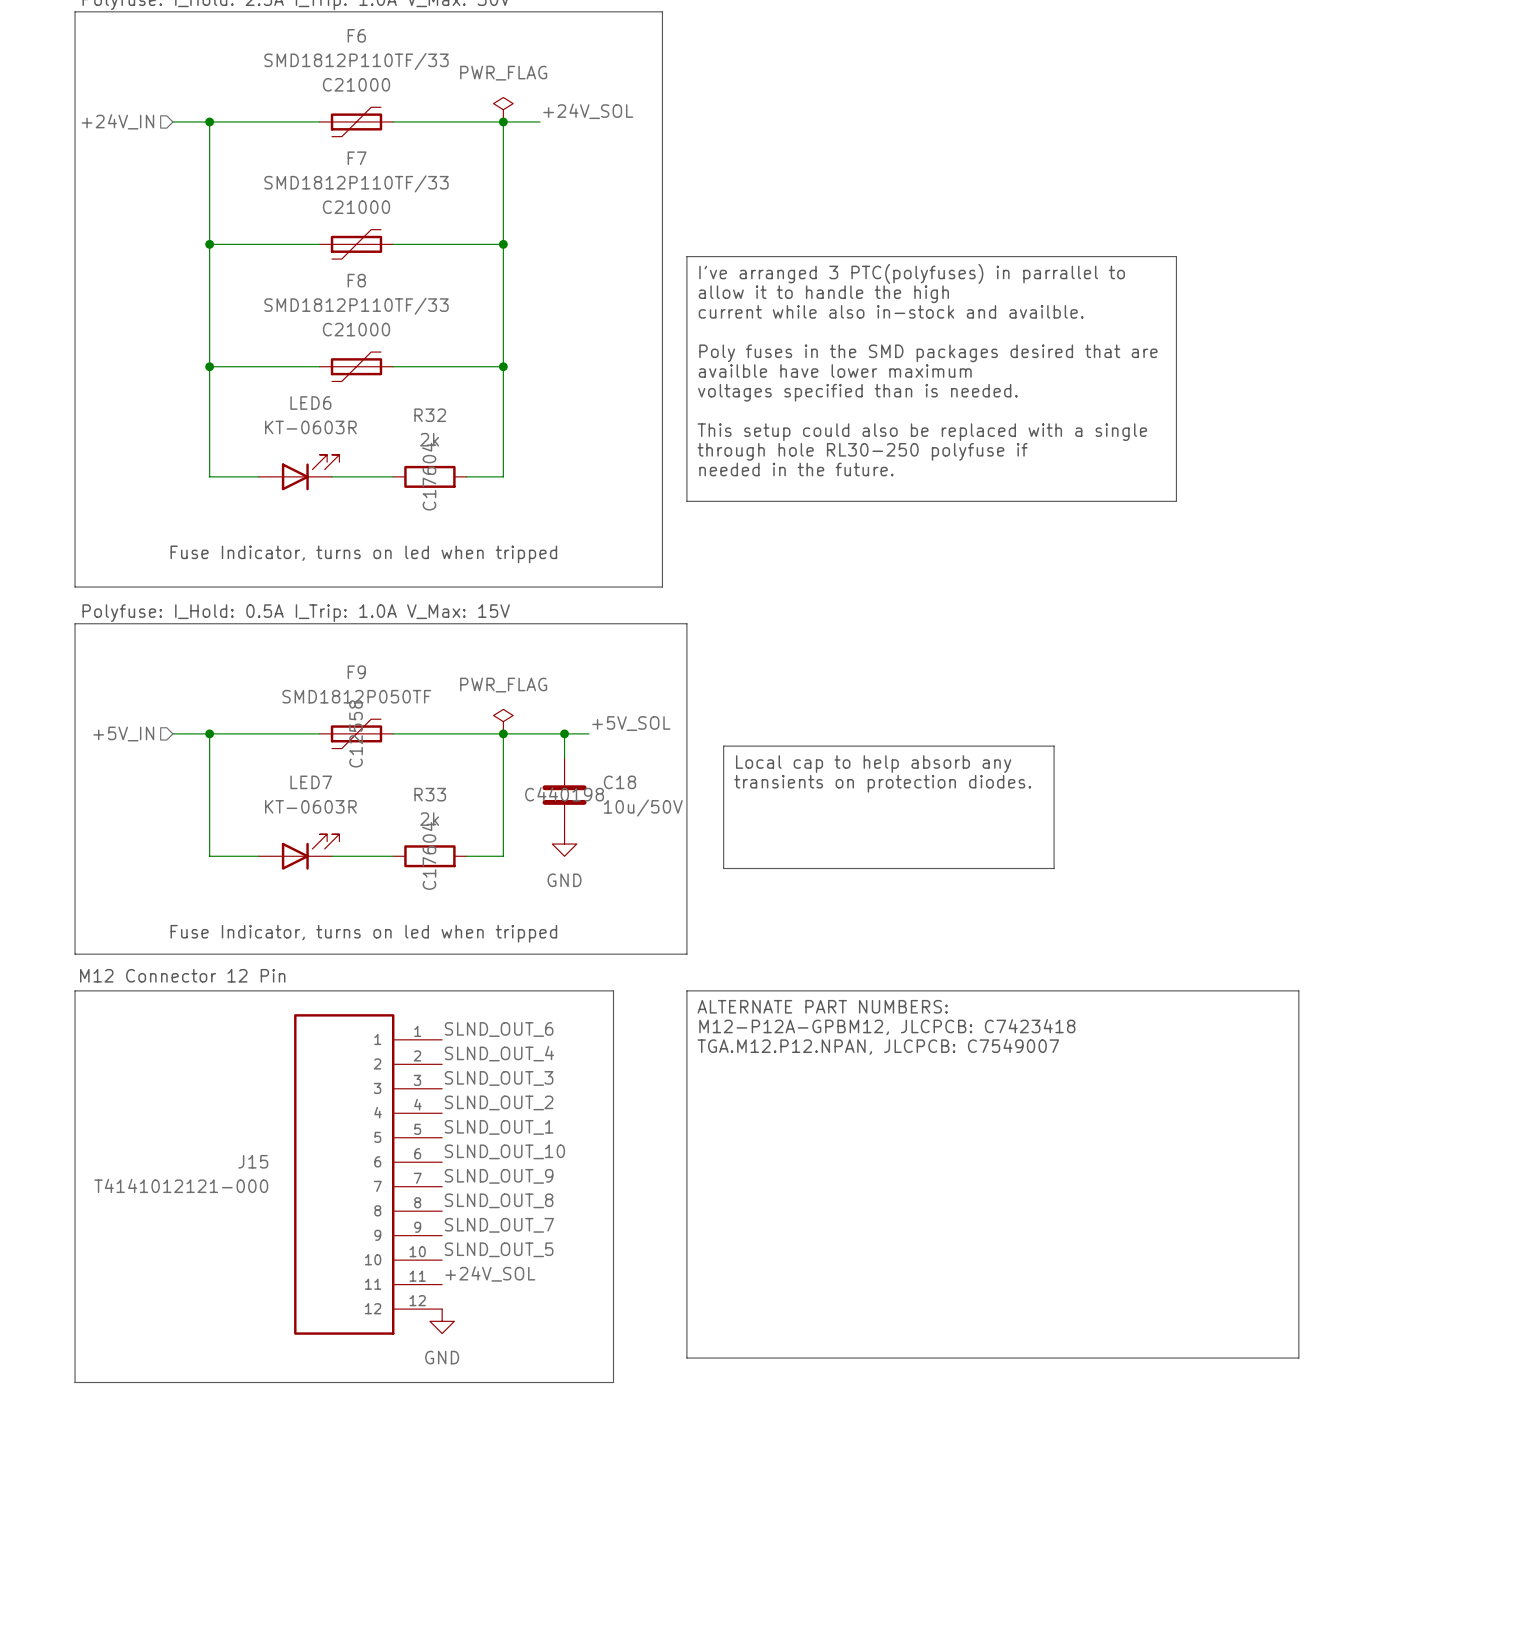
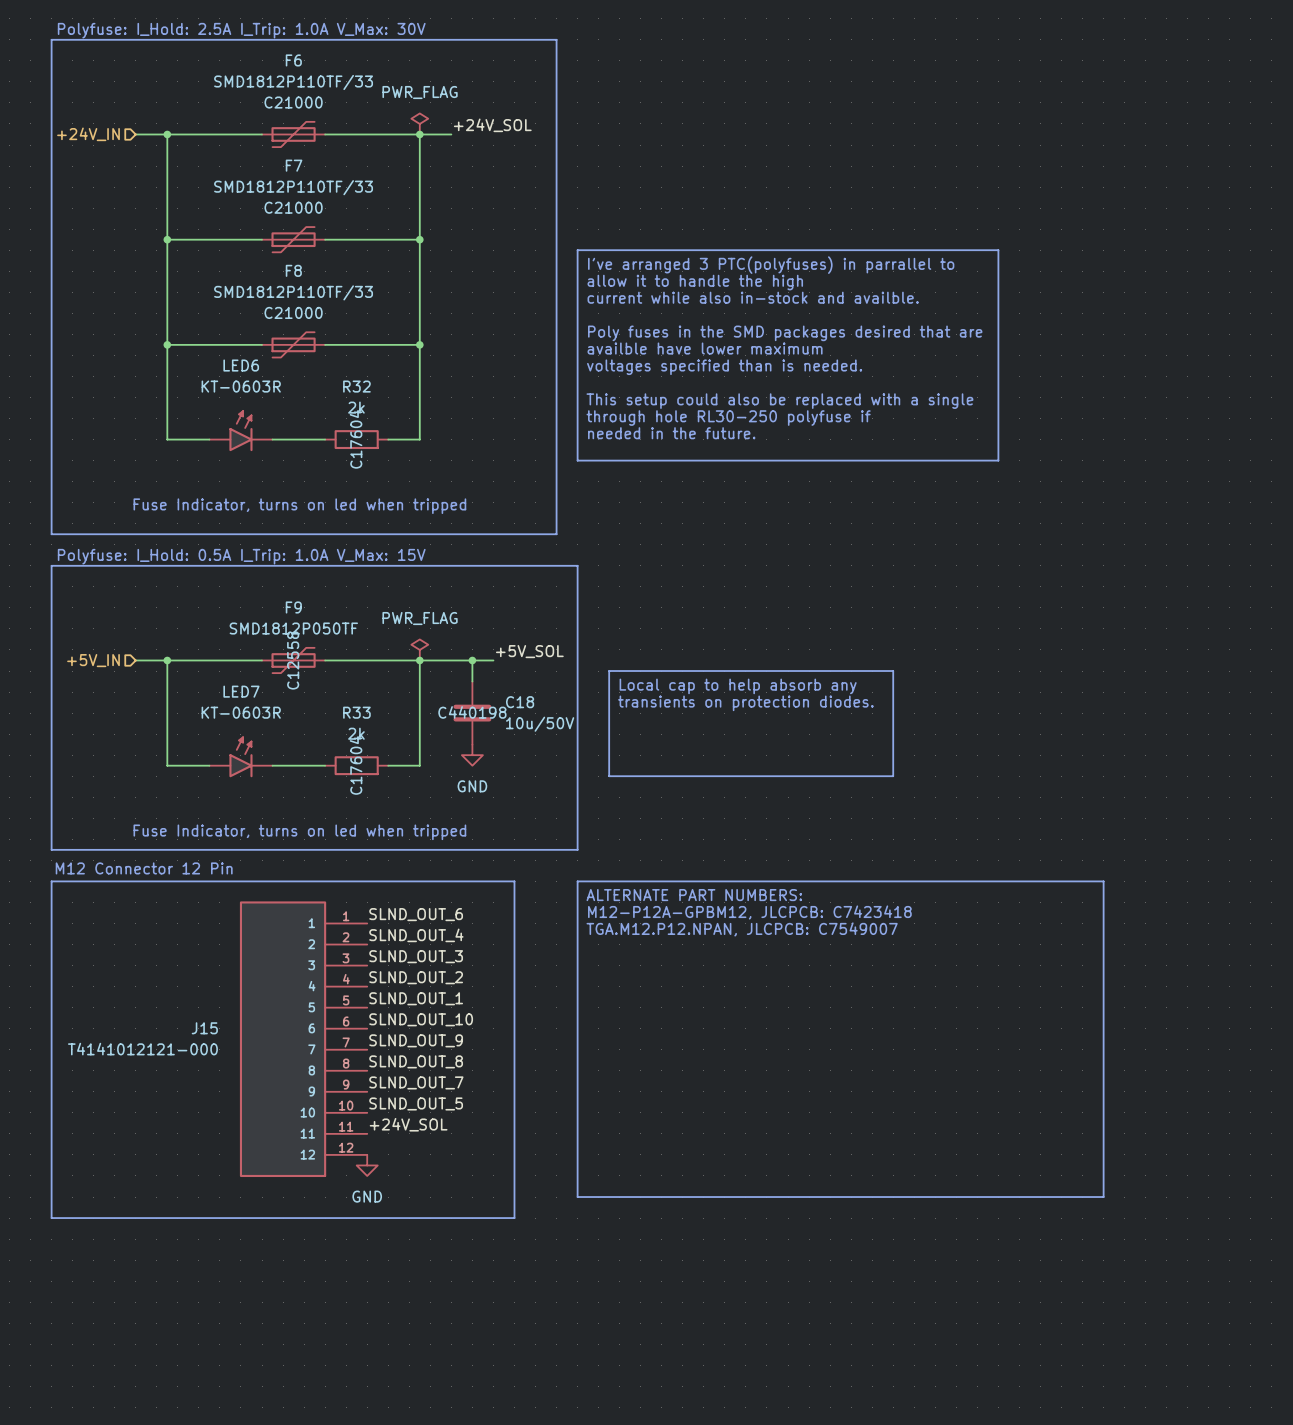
LED6 symbol: [258, 454, 340, 491] -> [209, 410, 273, 452]
LED7 symbol: [258, 834, 340, 870] -> [209, 736, 273, 778]

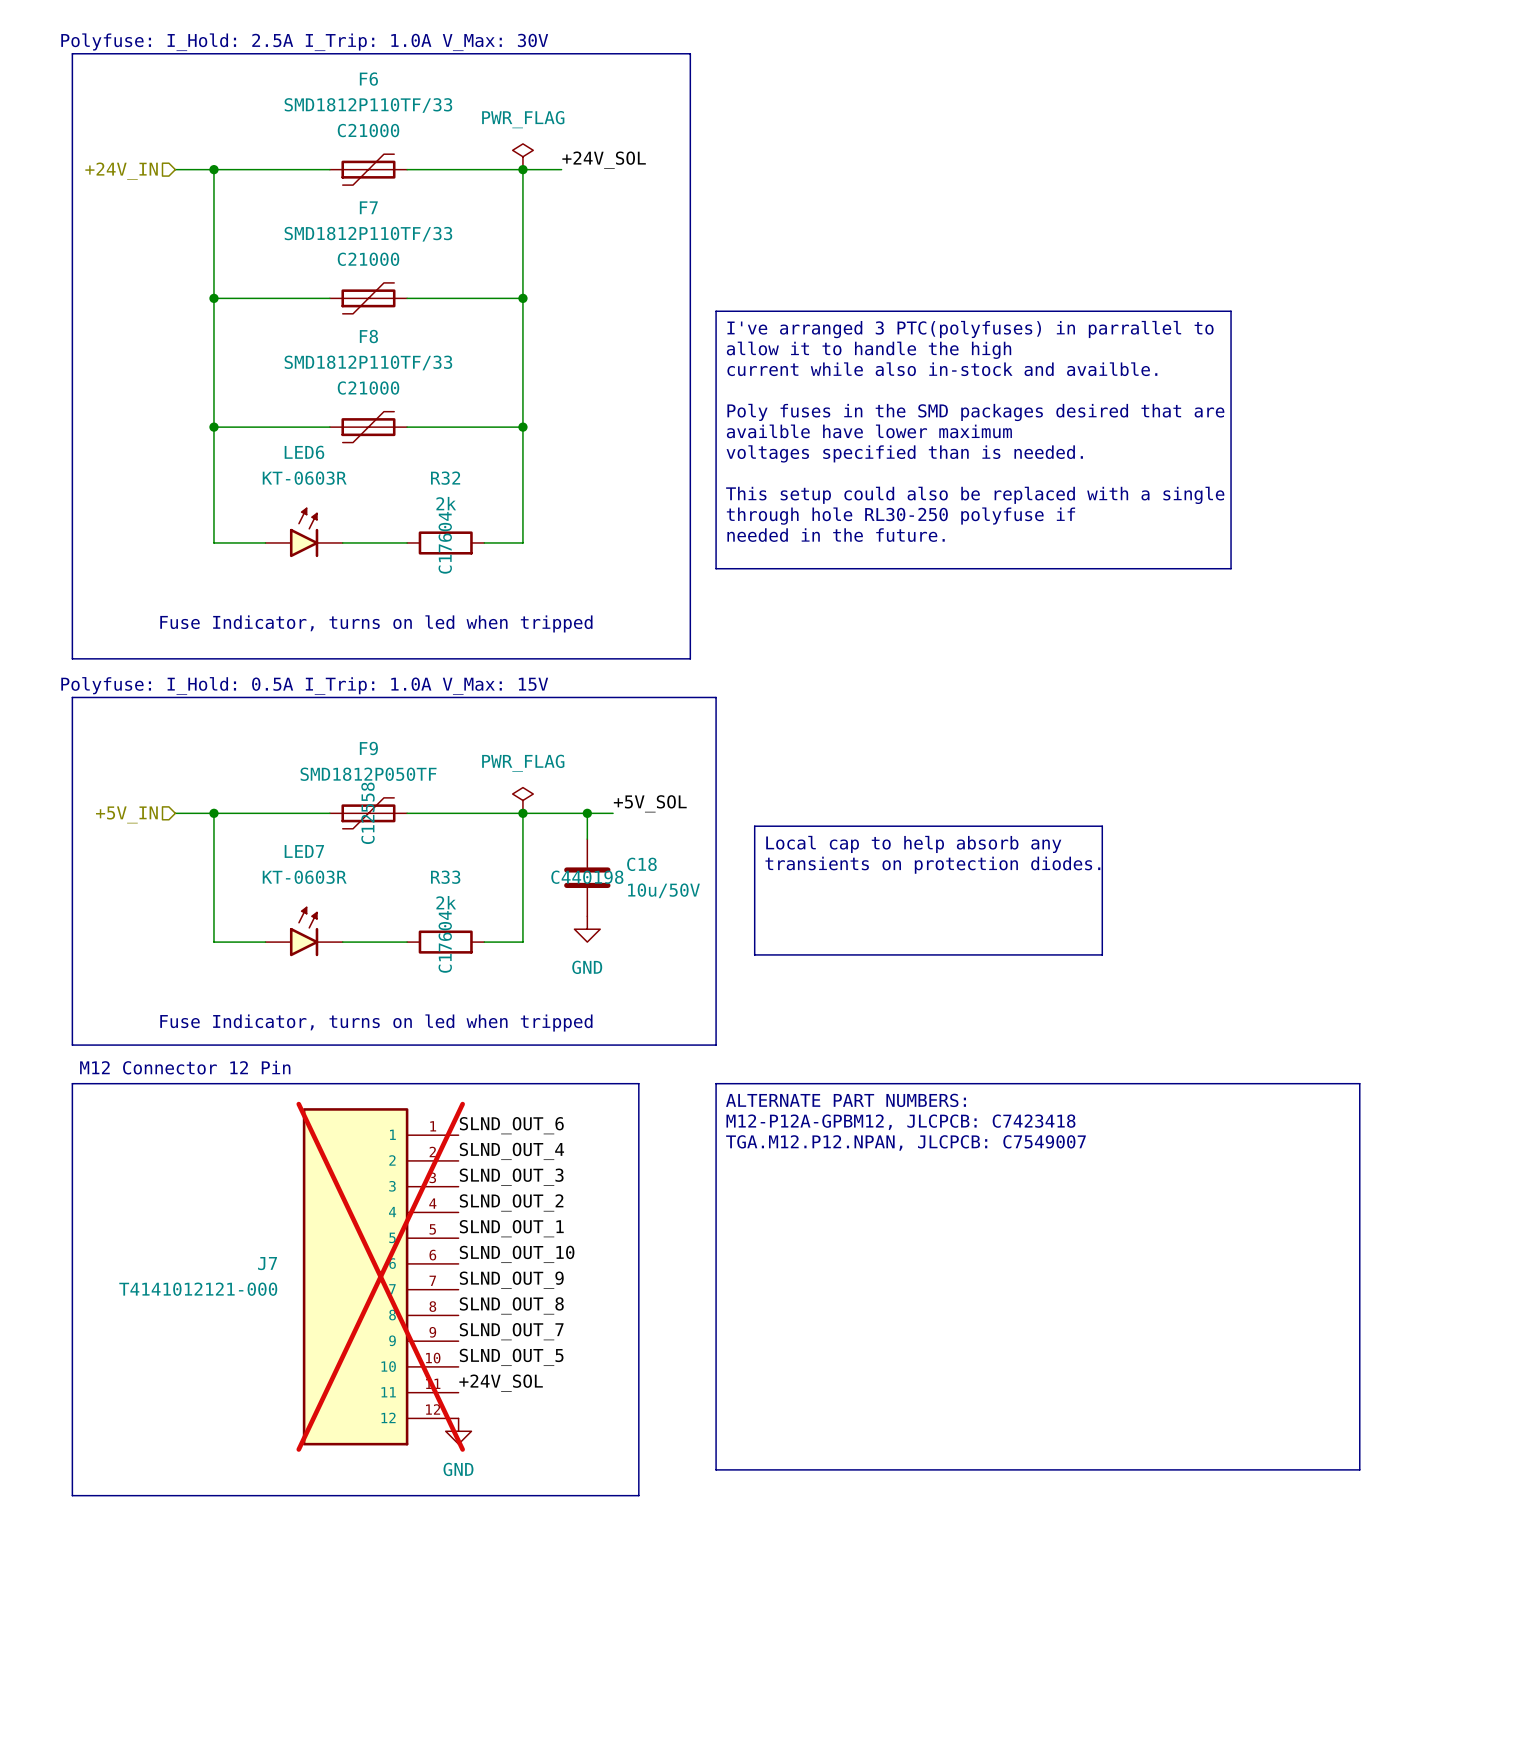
J15 name: J15 (204, 1028) -> J7 (267, 1263)
J15 do-not-place cross: none -> (380, 1276)

